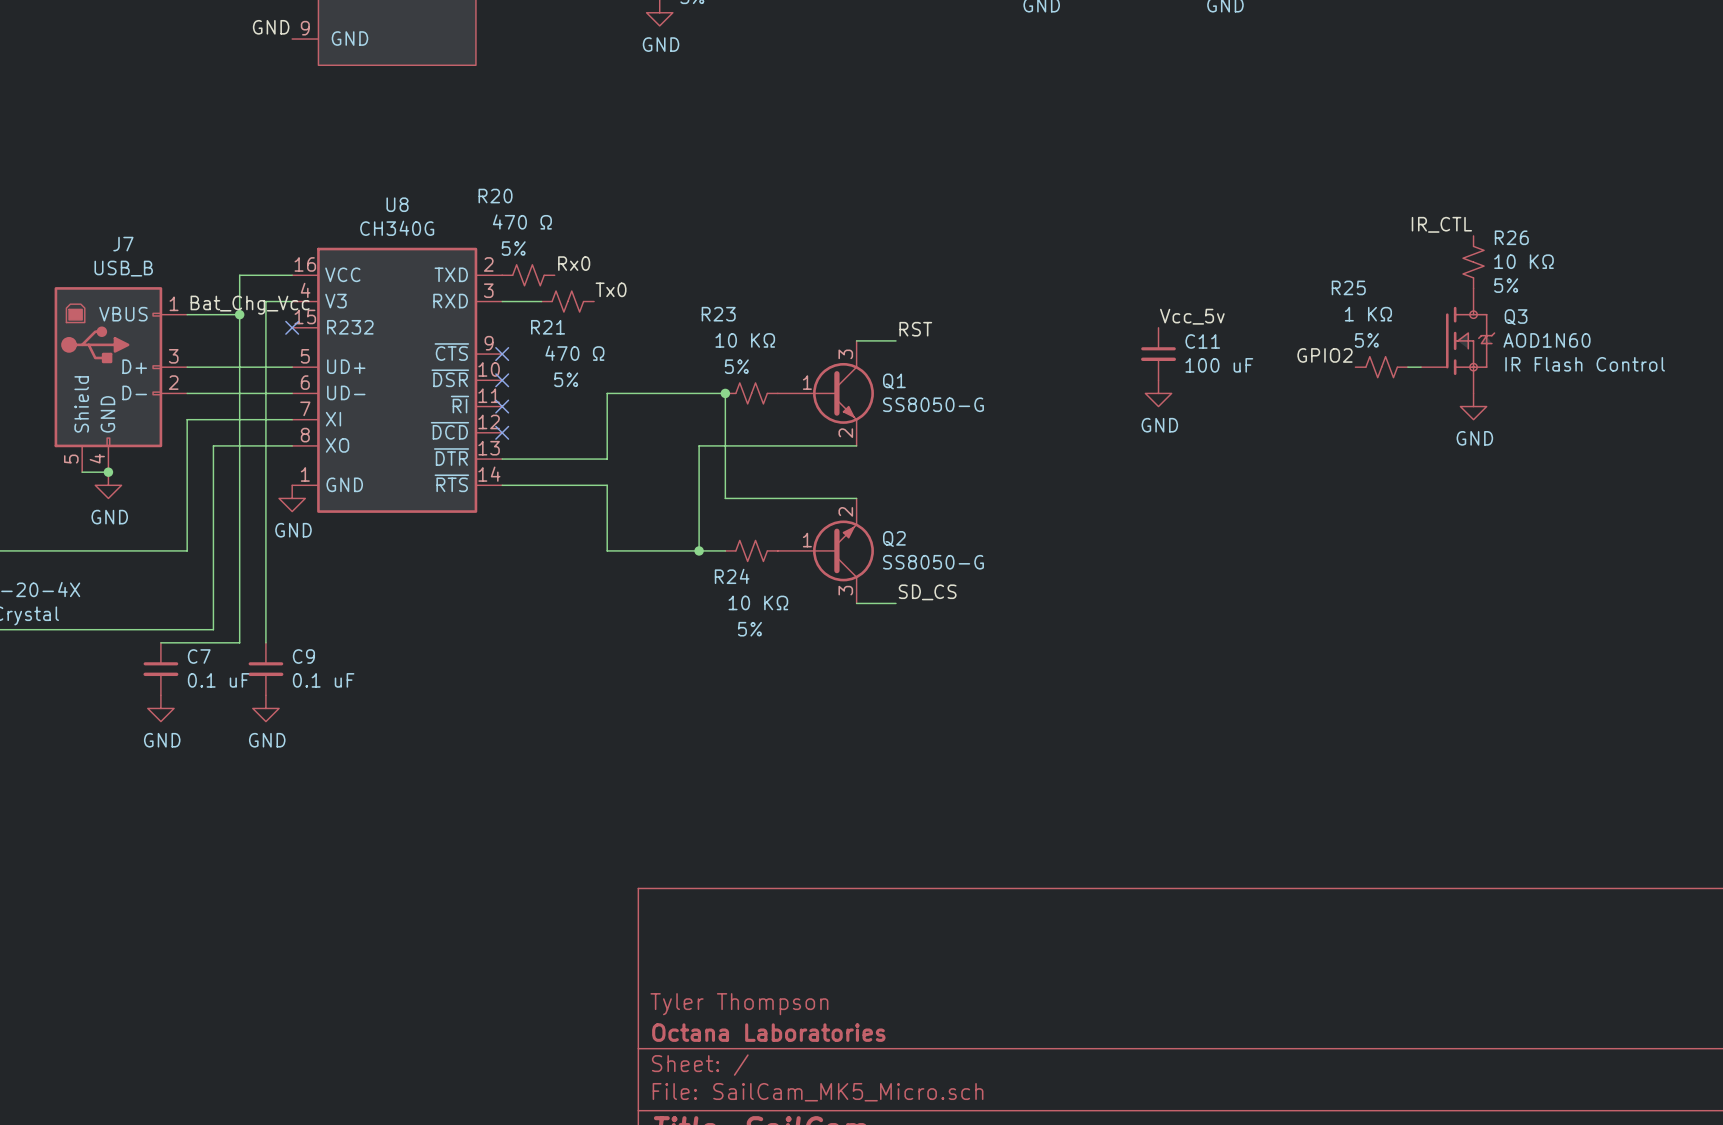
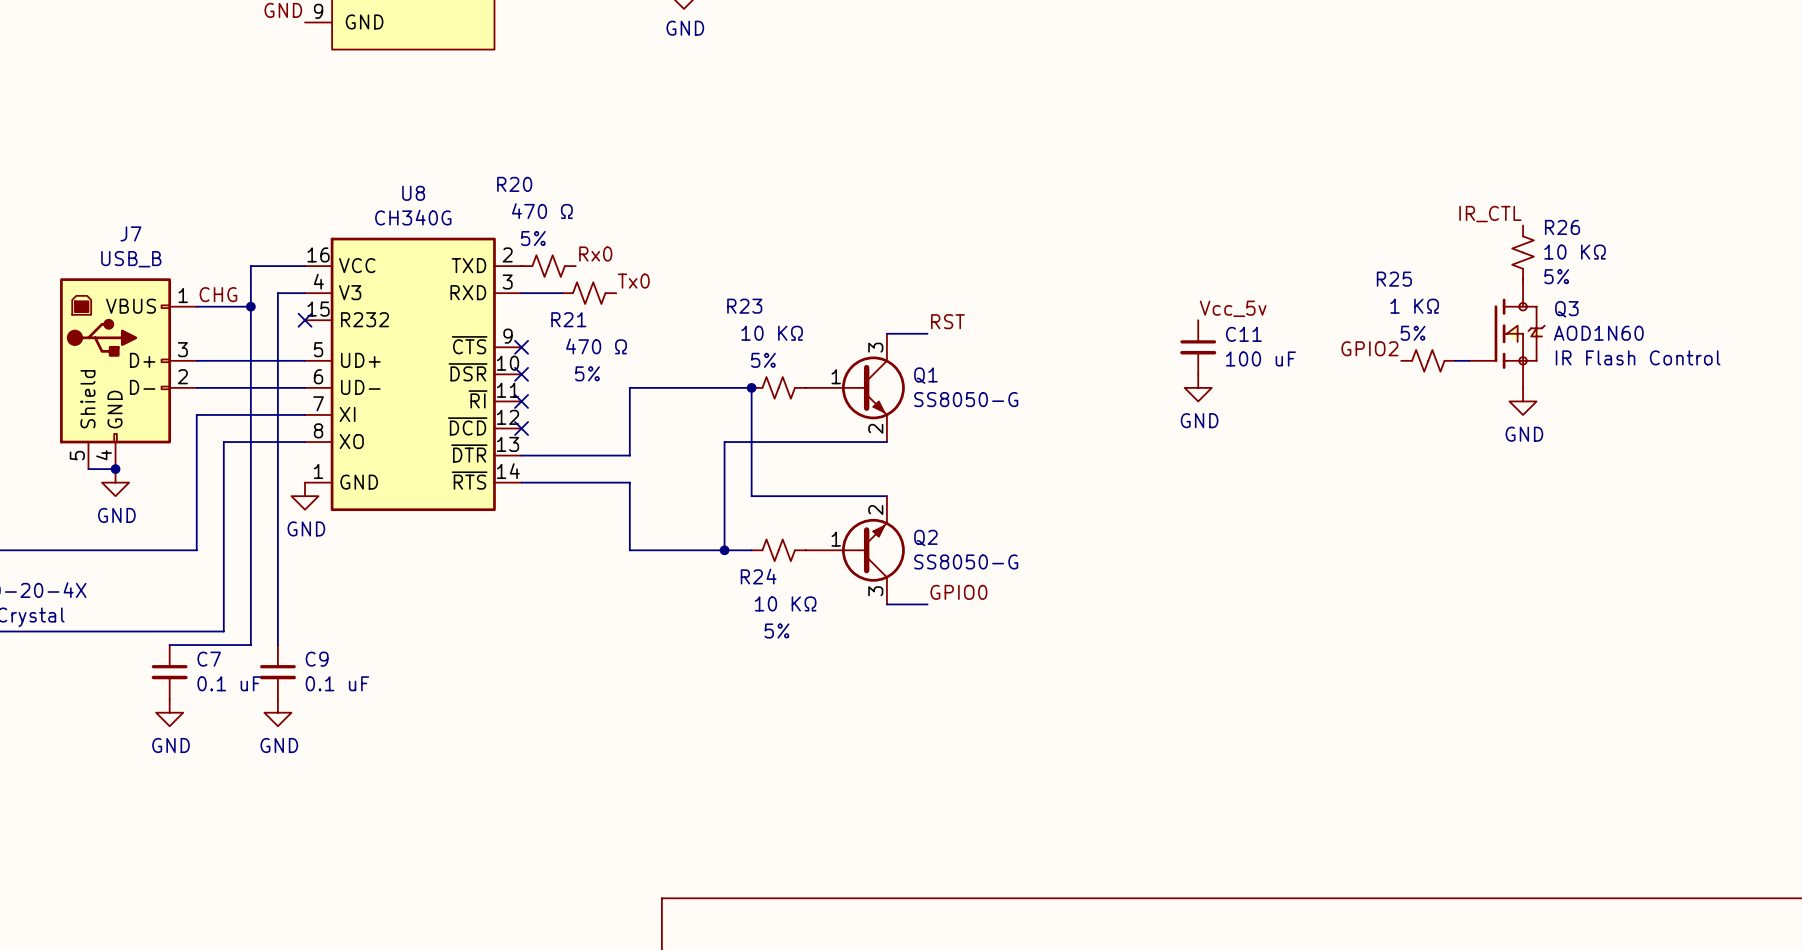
label: Bat_Chg_Vcc (250, 305) -> CHG (218, 294)
label: SD_CS (927, 592) -> GPIO0 (958, 592)

